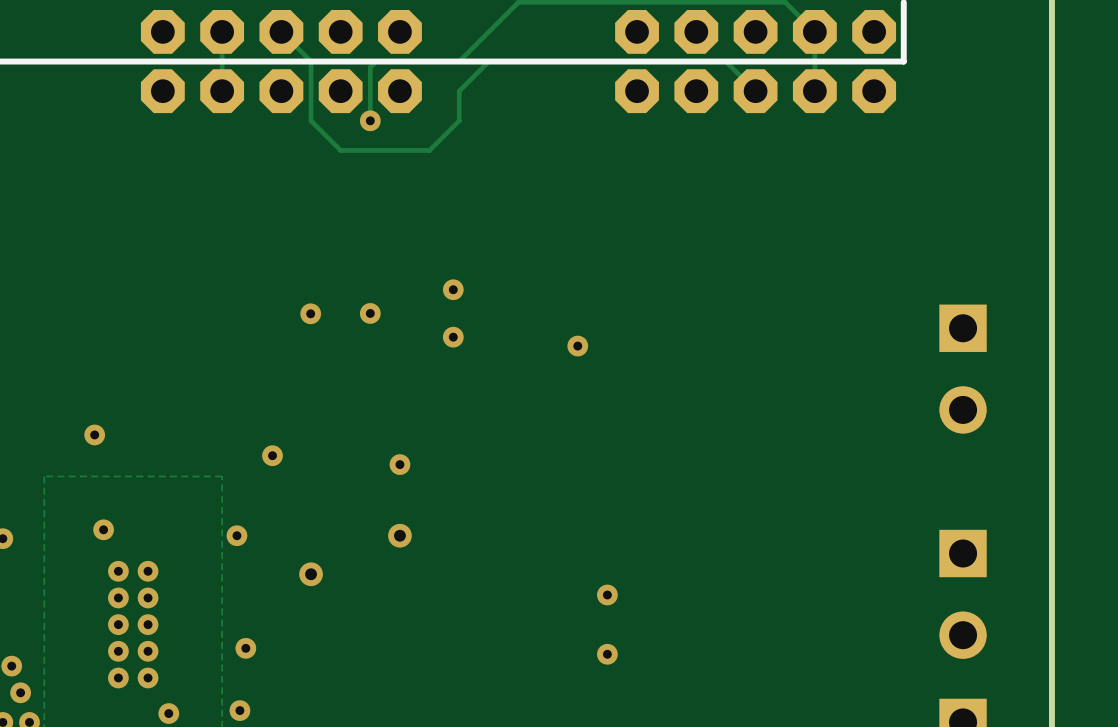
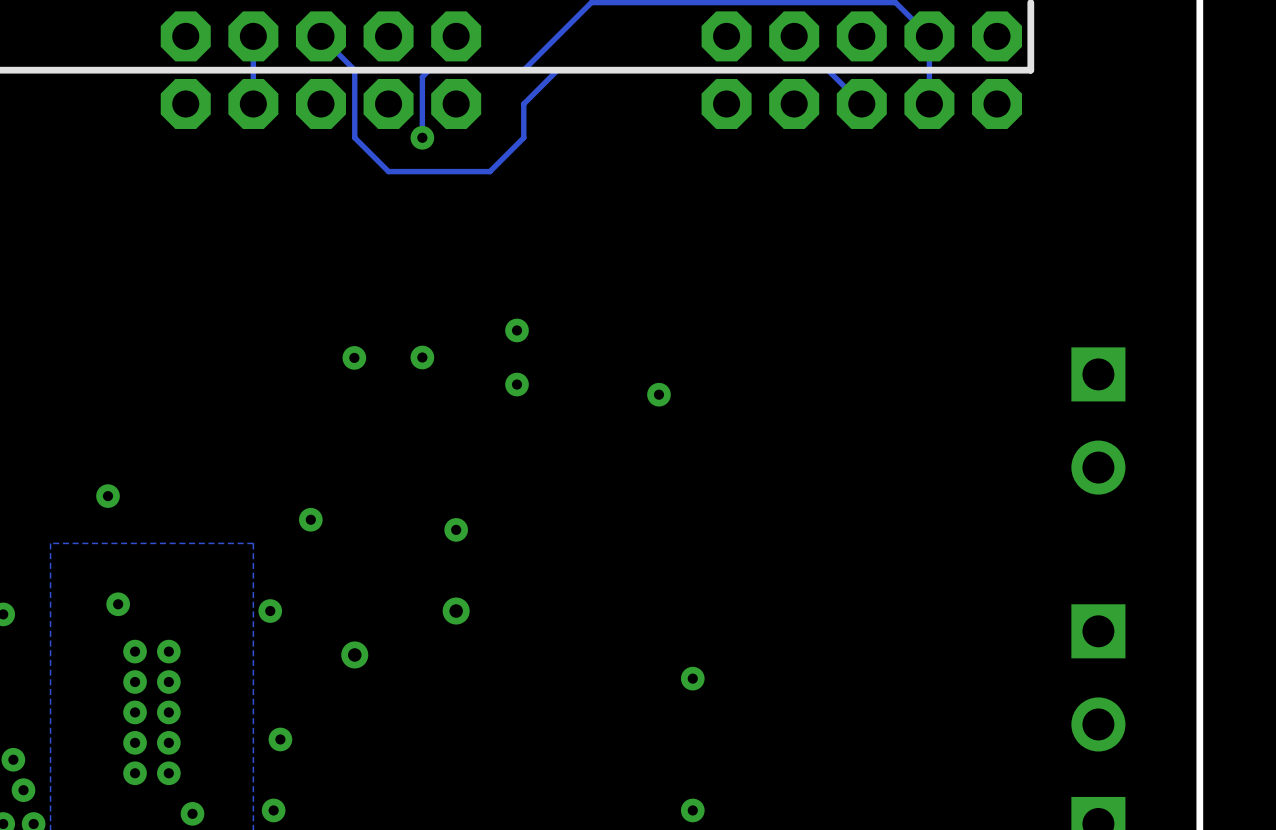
via: (607, 654) -> none
via: none -> (692, 810)

